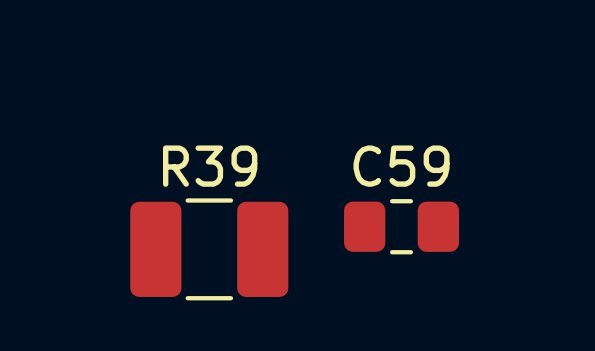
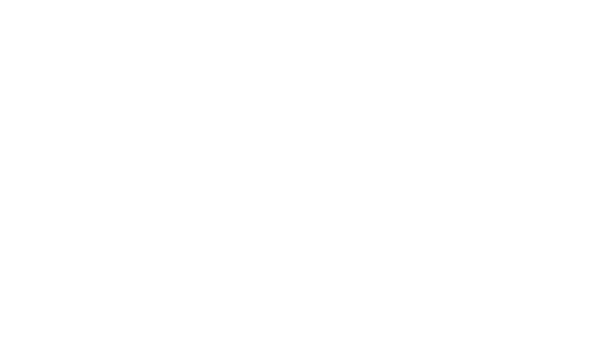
C59: (401, 226) -> none
R39: (209, 249) -> none

